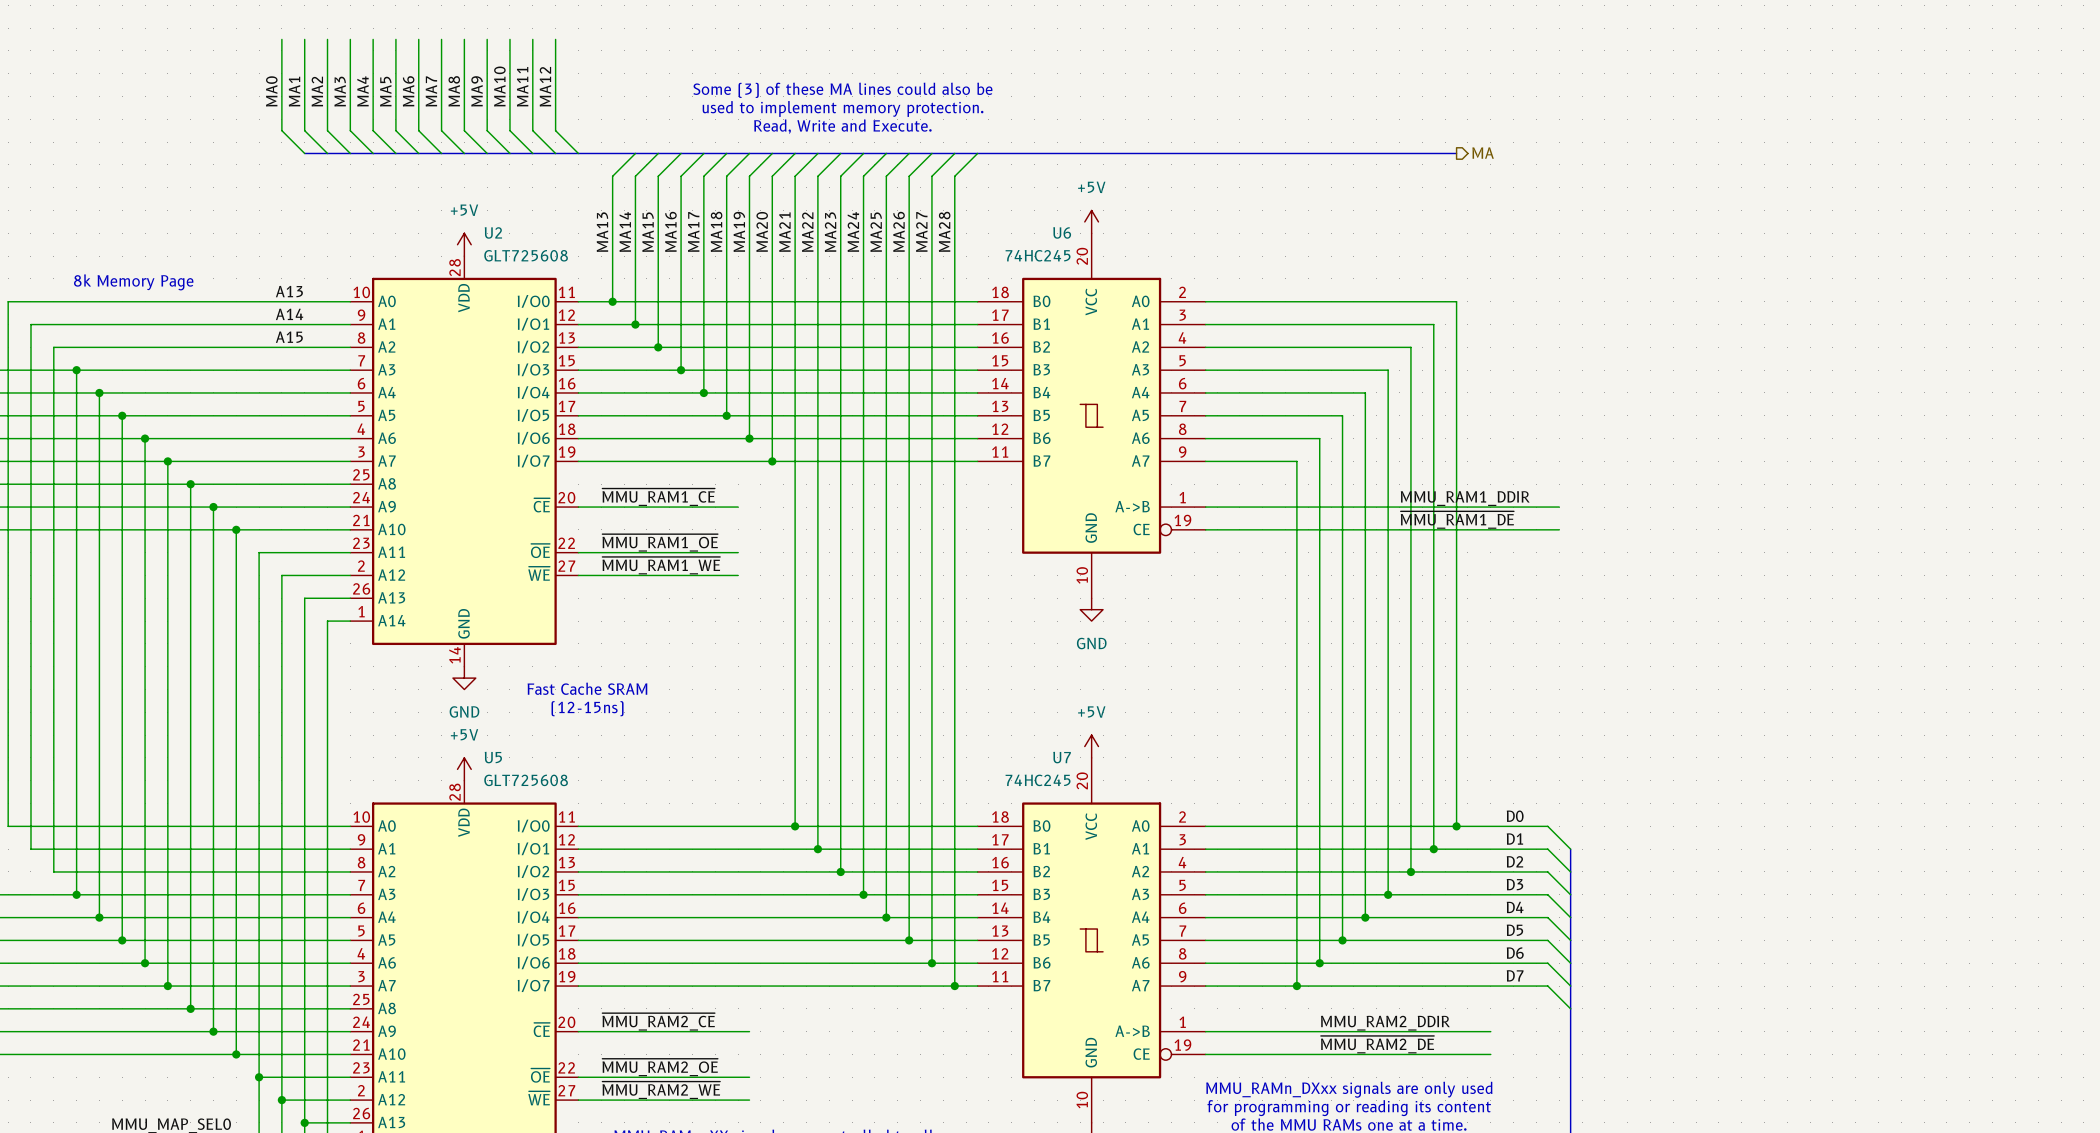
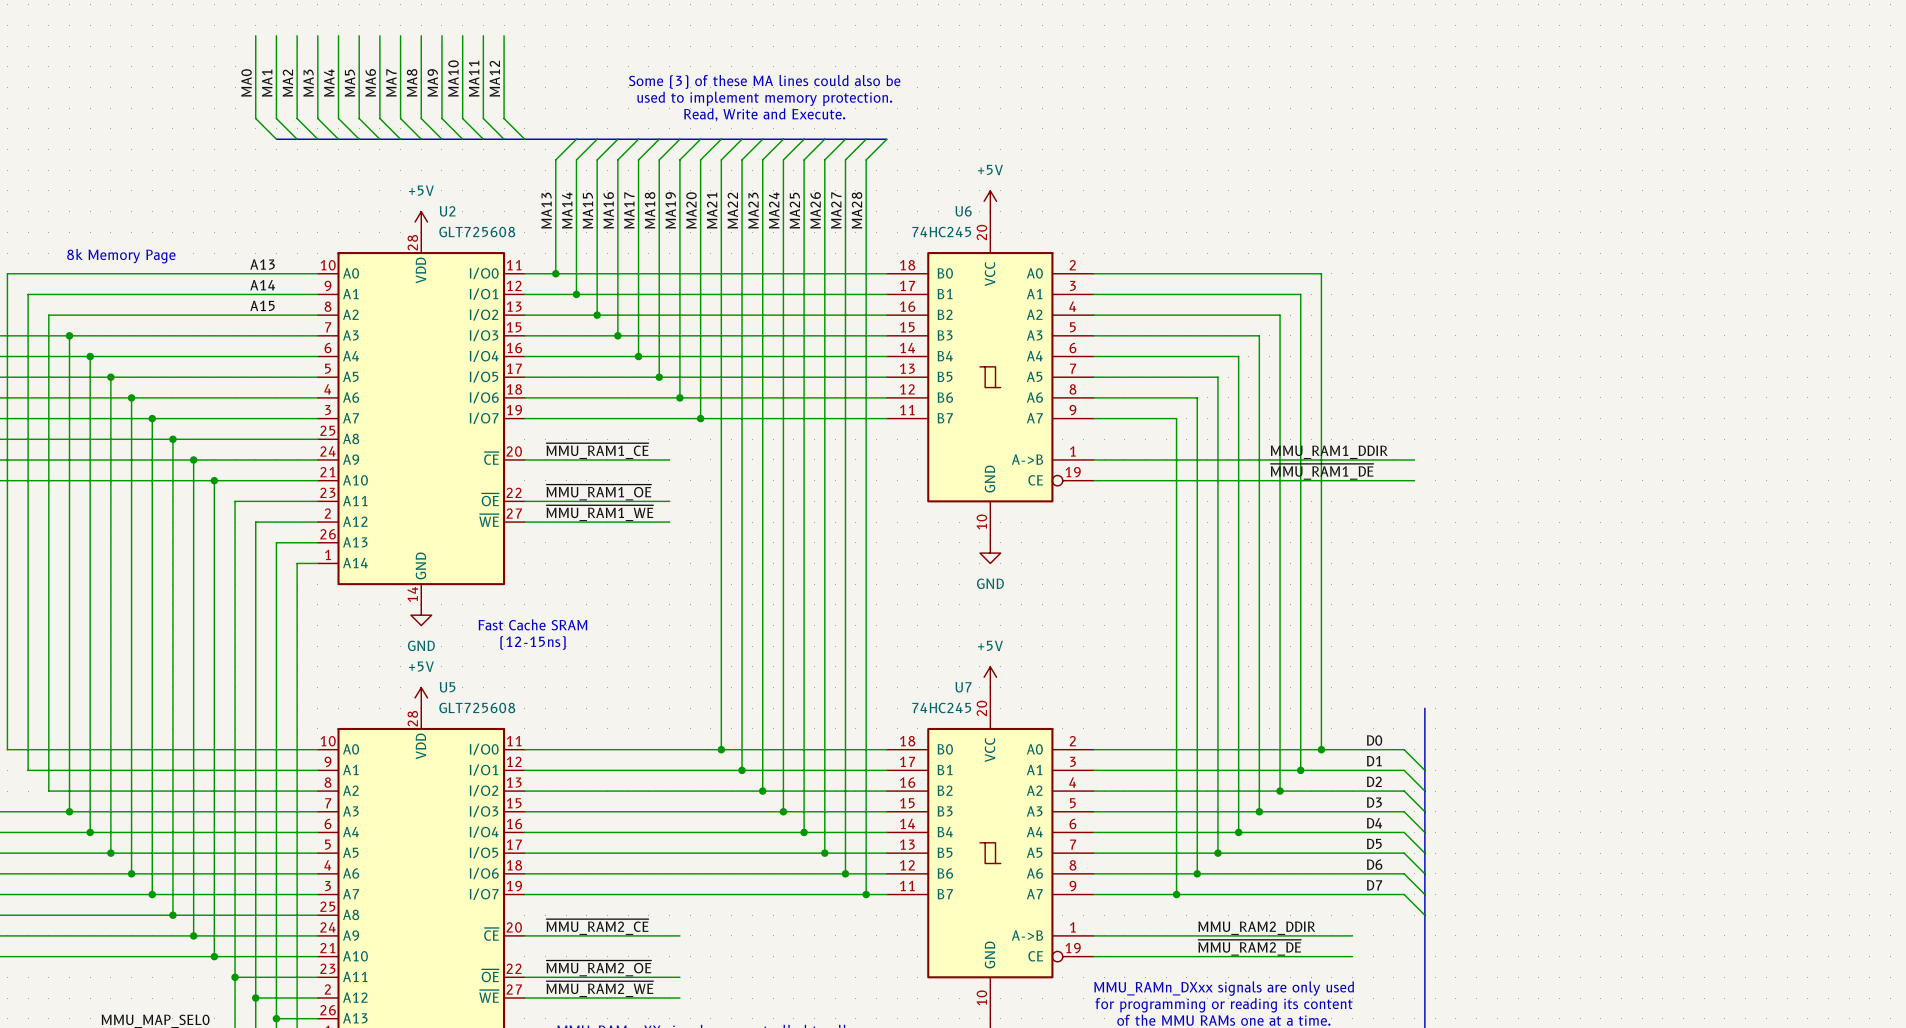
bus: (977, 153) (1456, 153) -> none
hierarchical label: MA (1483, 153) -> none
bus: none -> (1424, 708) (1424, 770)

